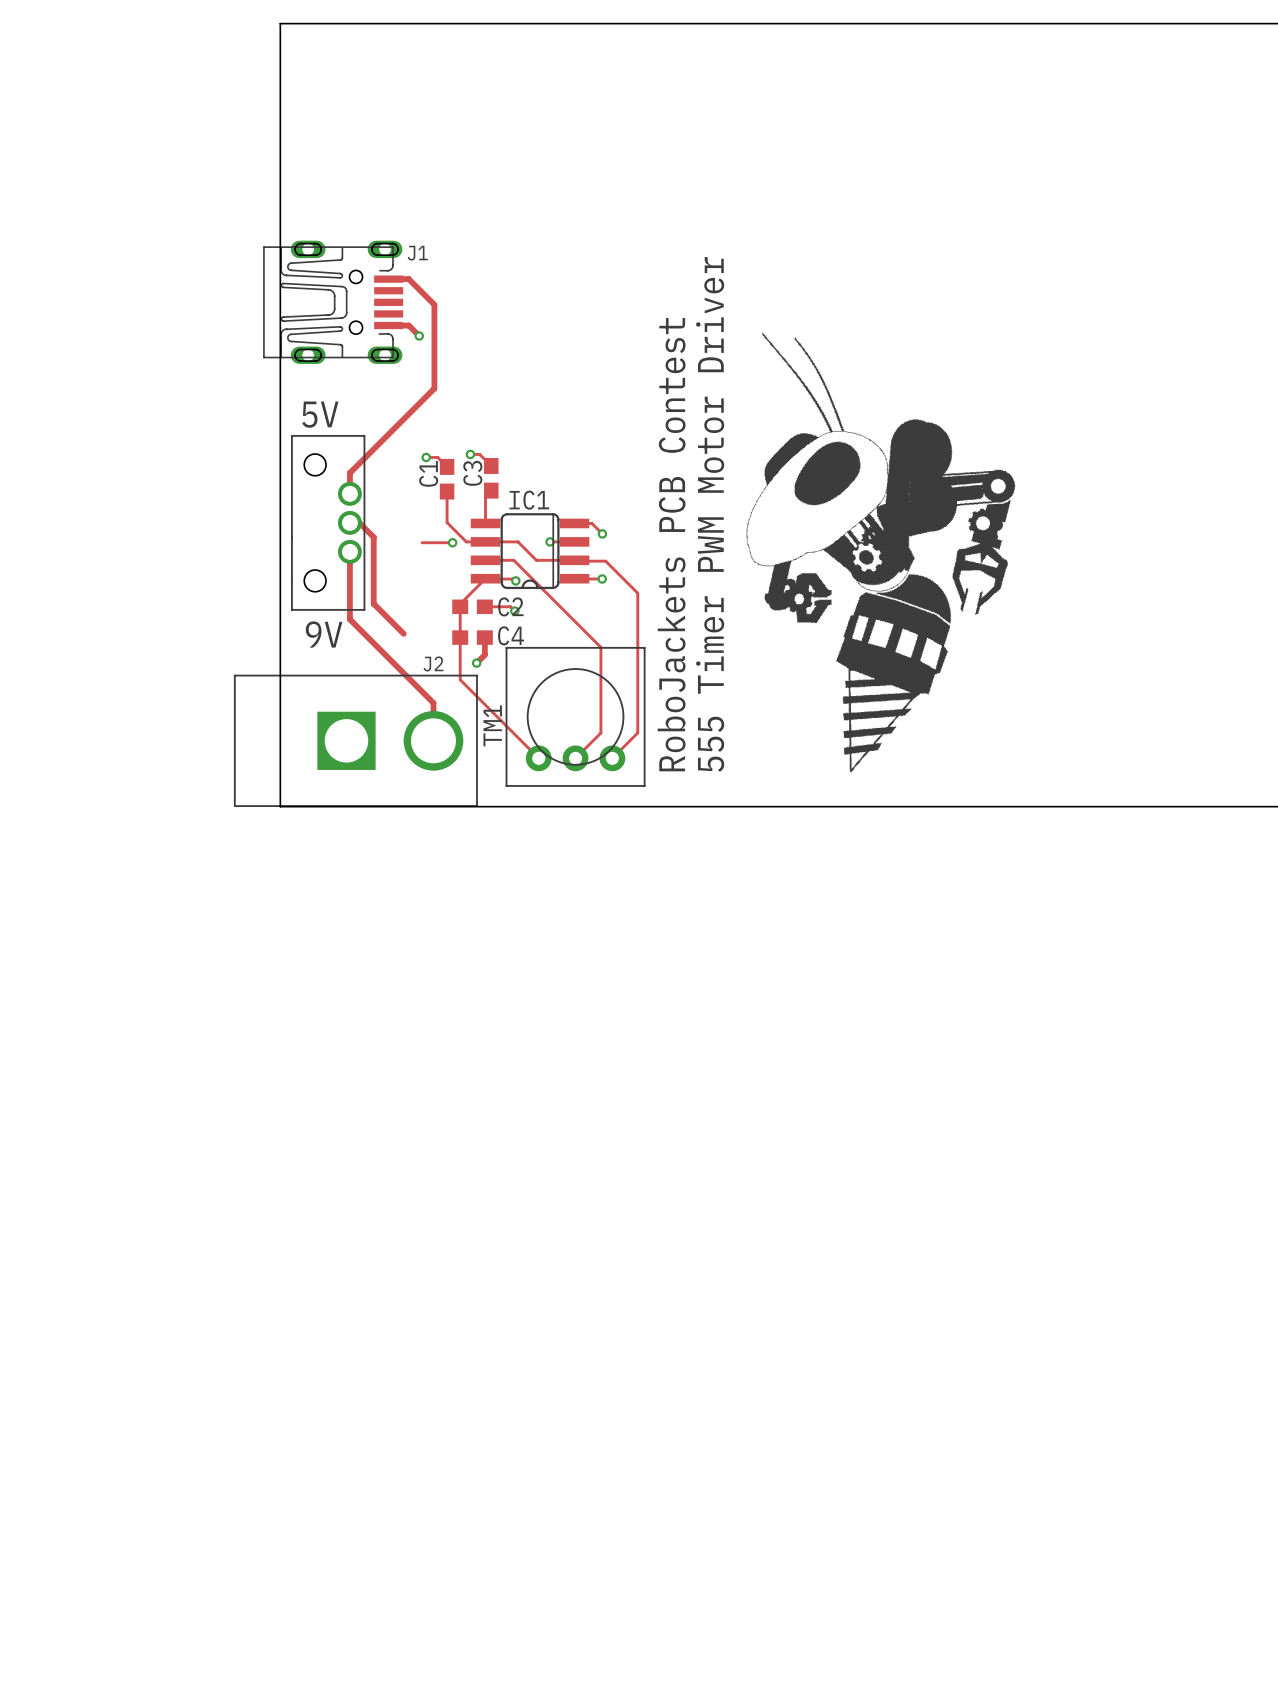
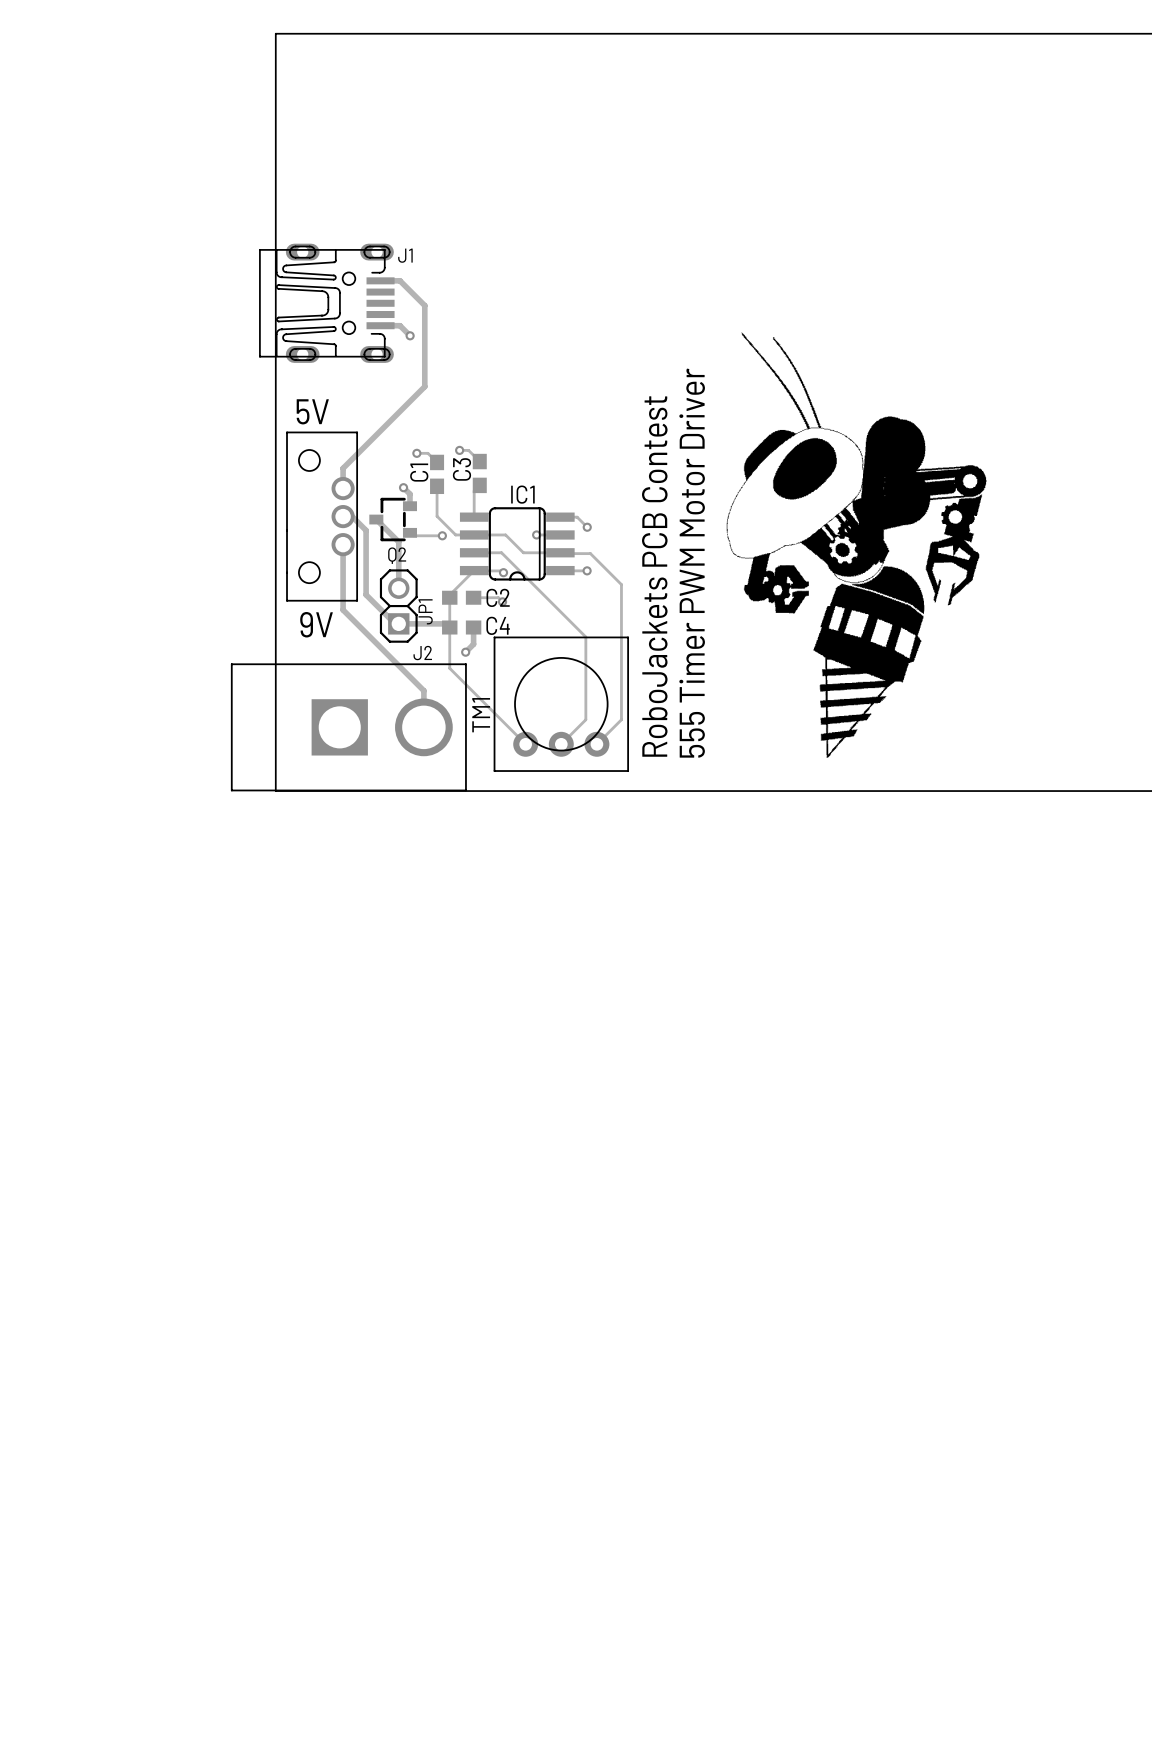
track: none -> (403, 487) (409, 494) (409, 506)
via: none -> (403, 487)
track: none -> (376, 519) (398, 541) (398, 588)
Q2: none -> (393, 519)
JP1: none -> (398, 606)
track: none -> (395, 623) (446, 623)

